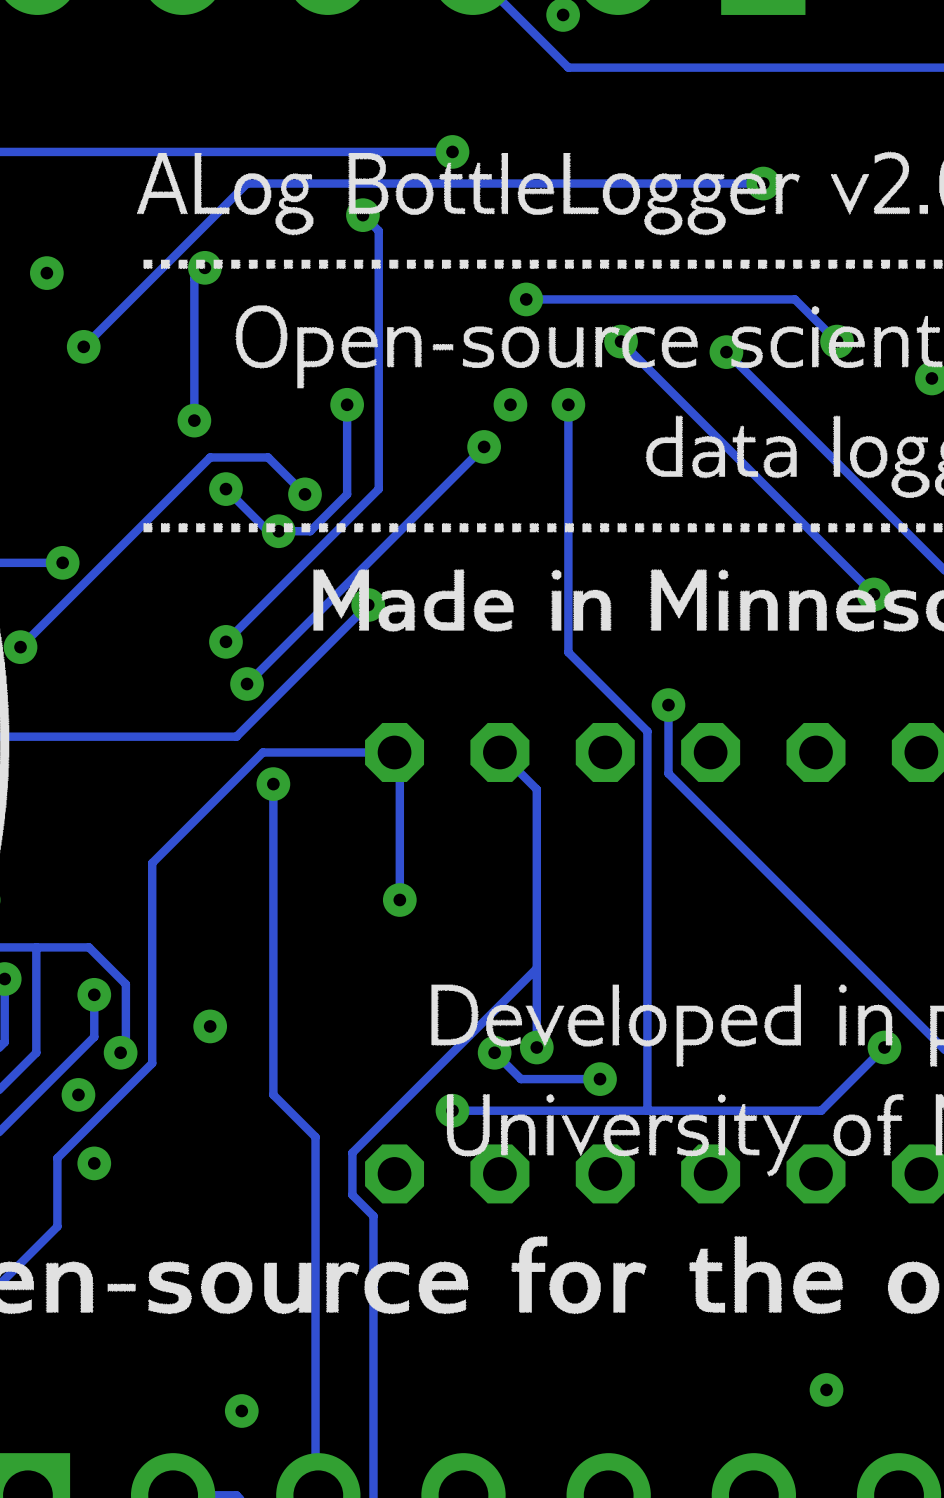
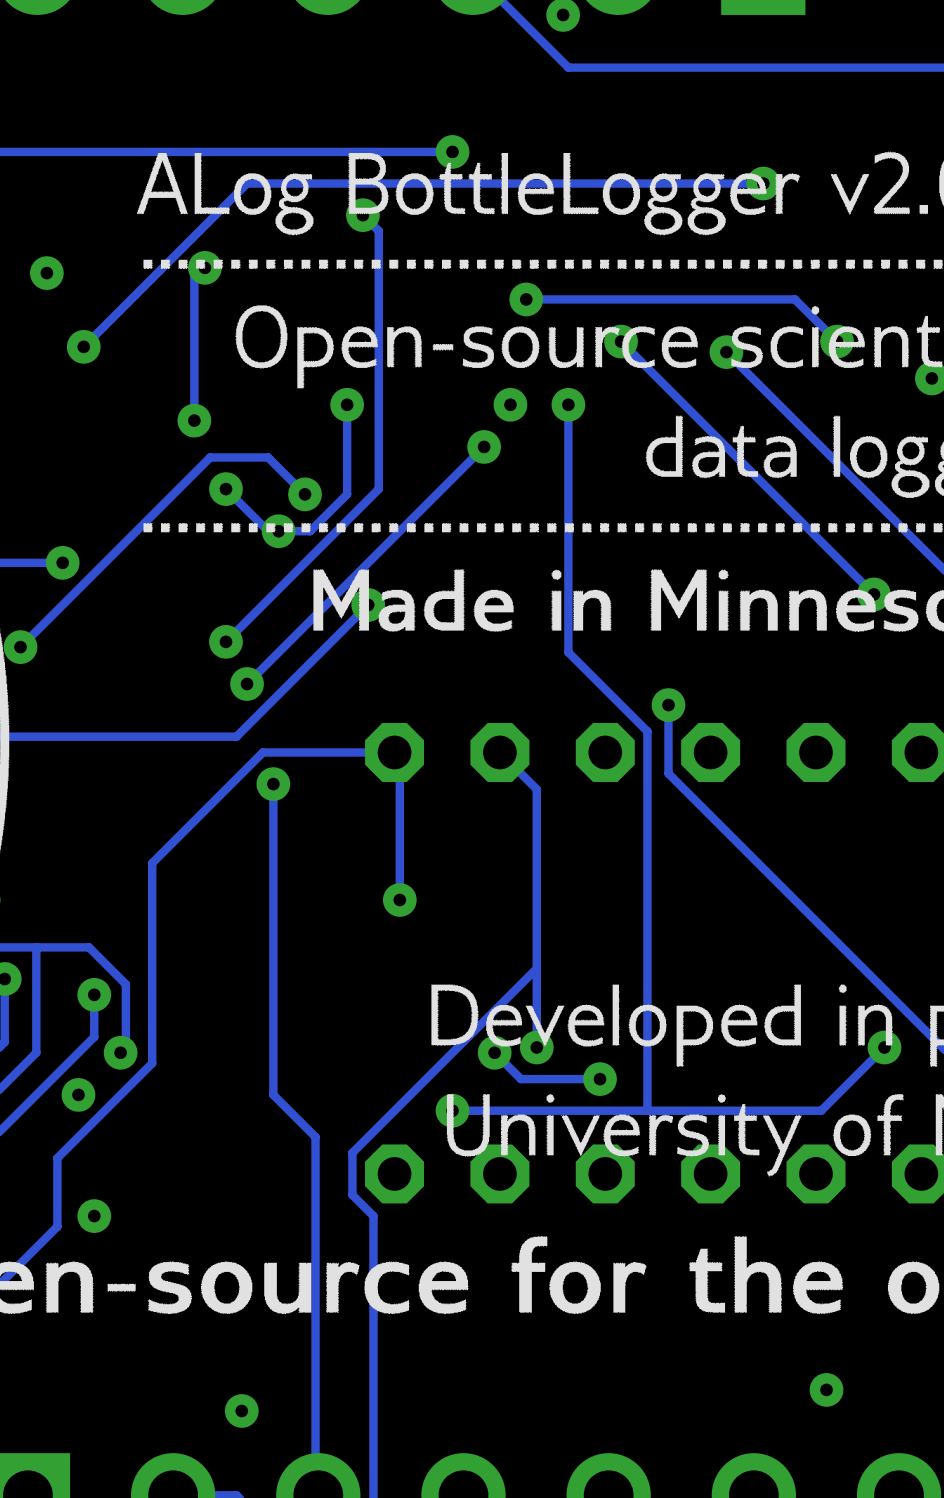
via: (210, 1026) -> none
via position: (94, 1163) -> (94, 1216)

